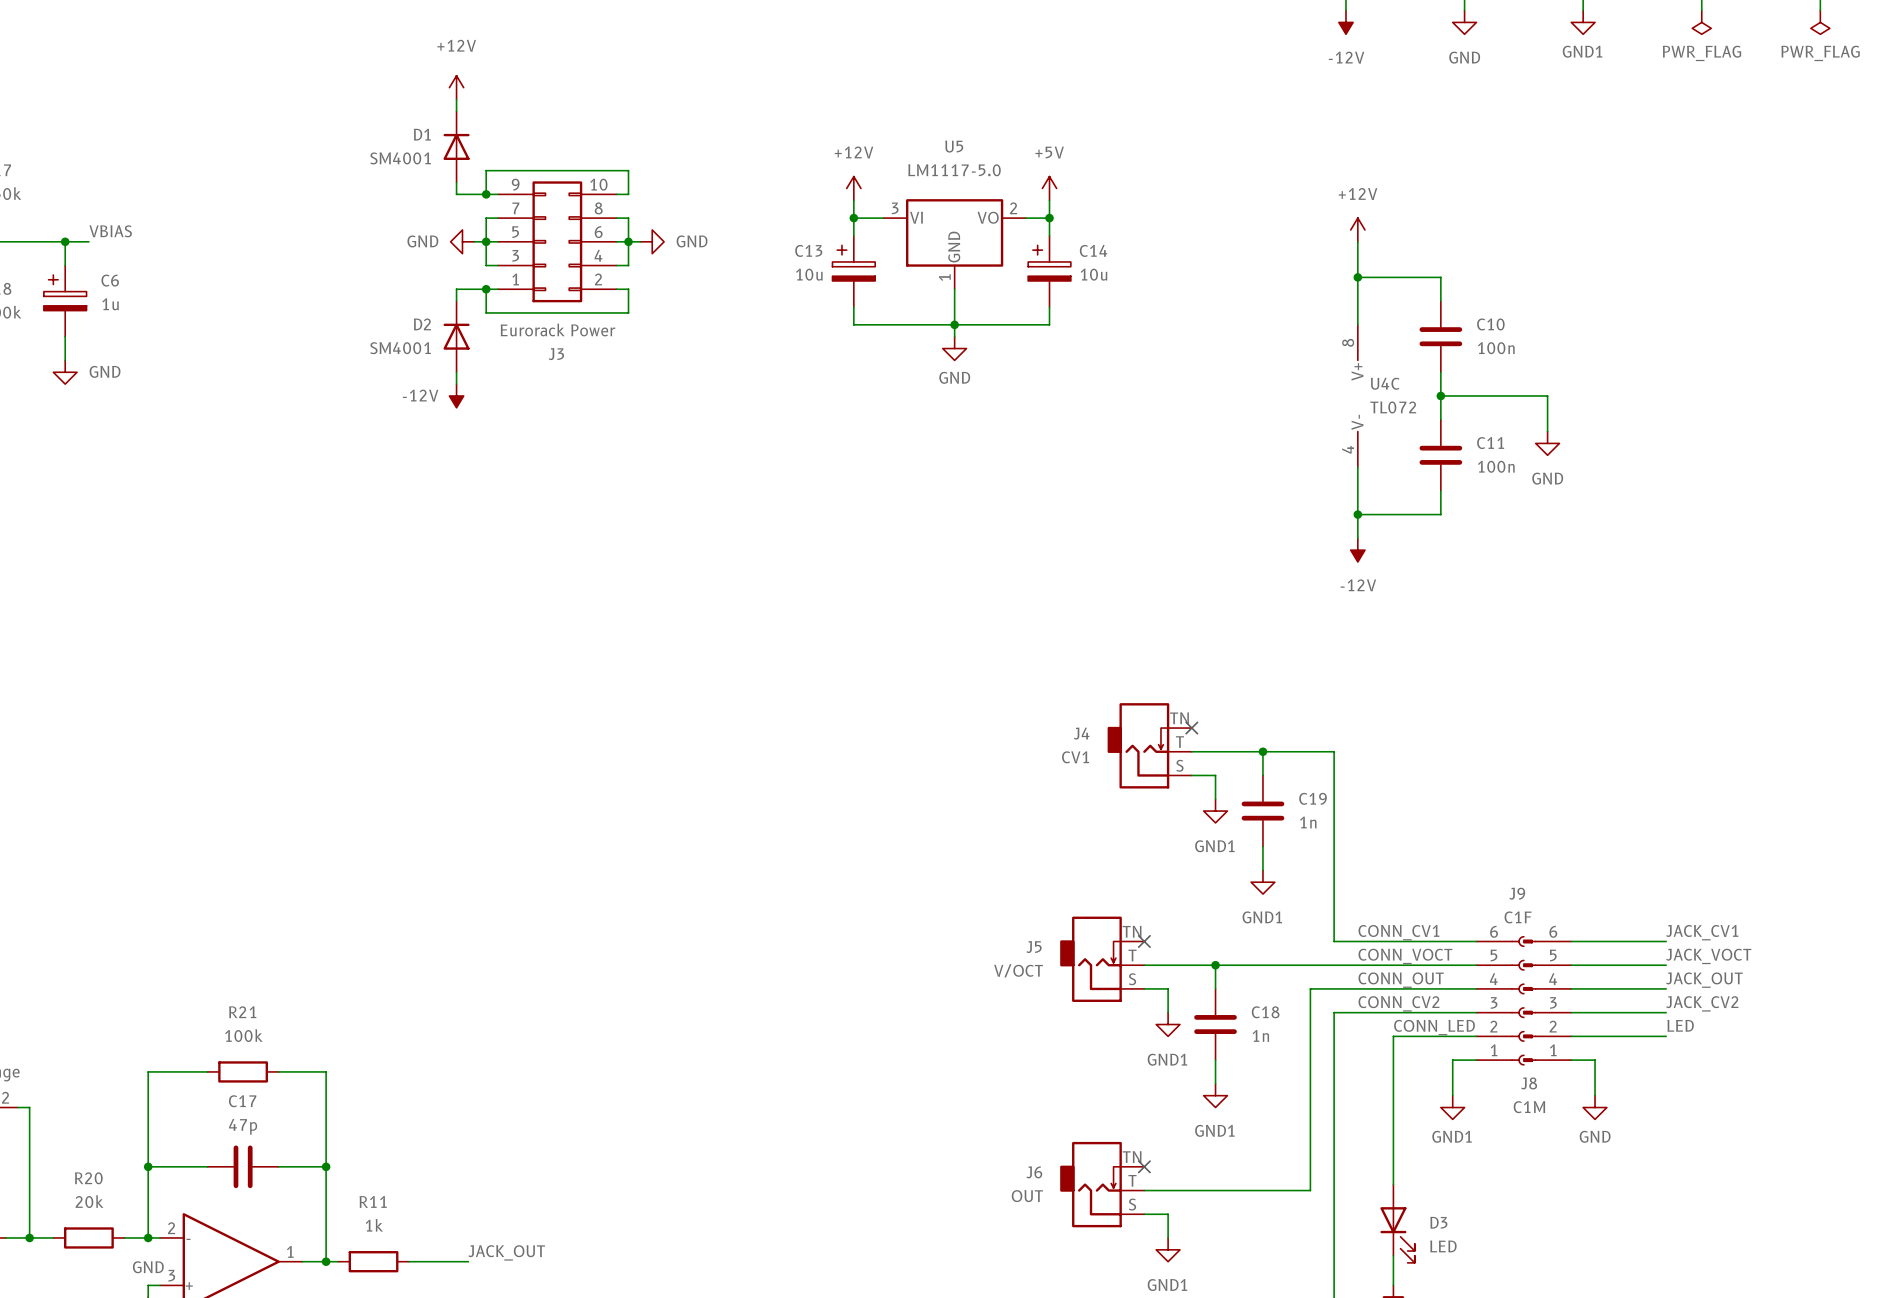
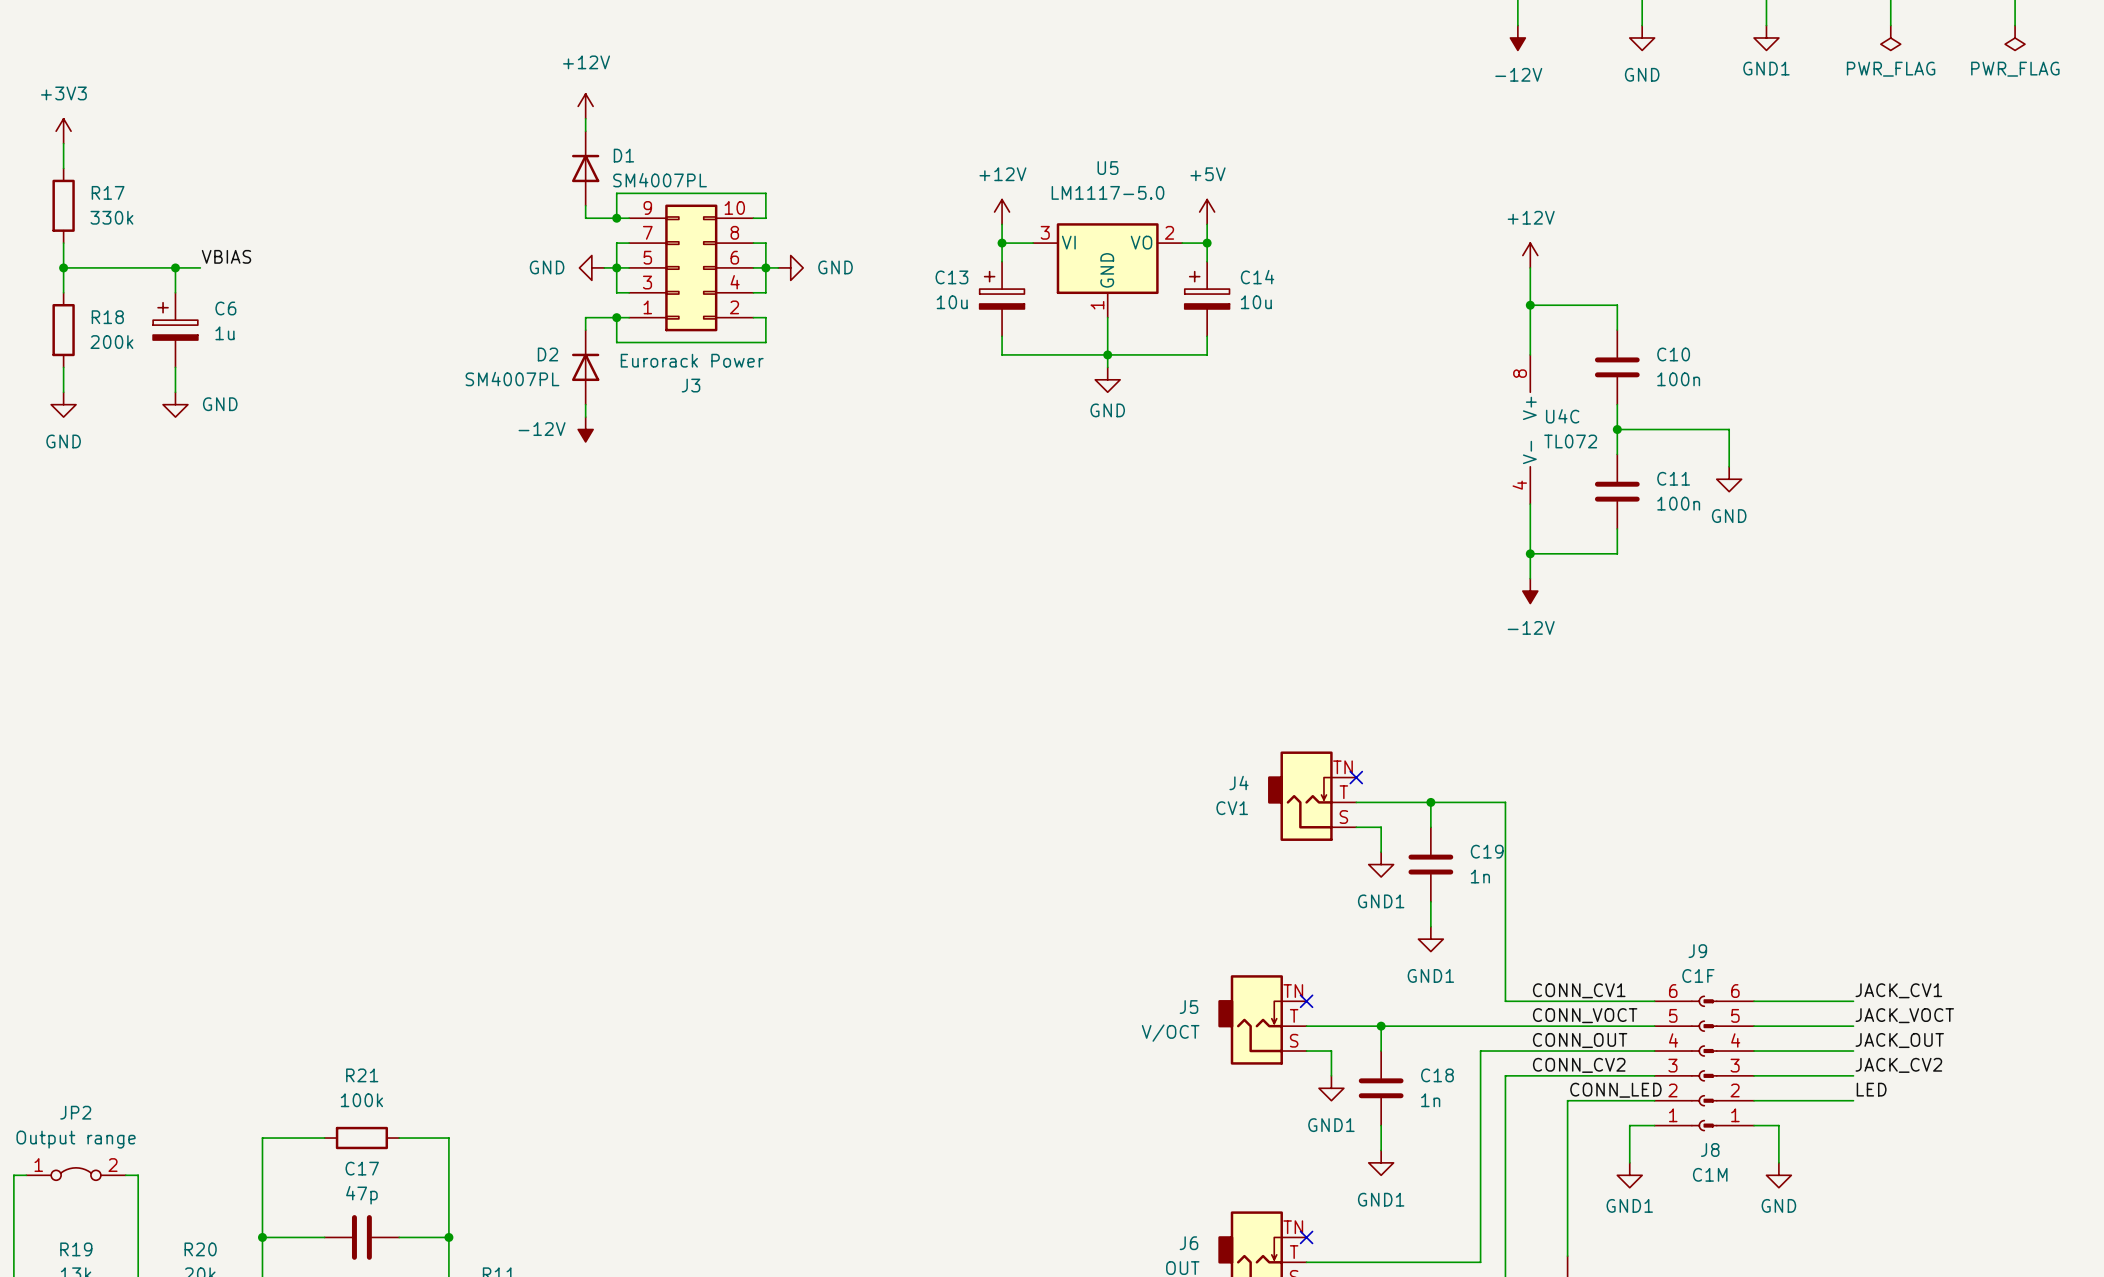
D1 name position: D1 (422, 134) -> D1 (623, 155)
D1 value: SM4001 (400, 158) -> SM4007PL (660, 180)
D2 value: SM4001 (400, 348) -> SM4007PL (512, 379)

